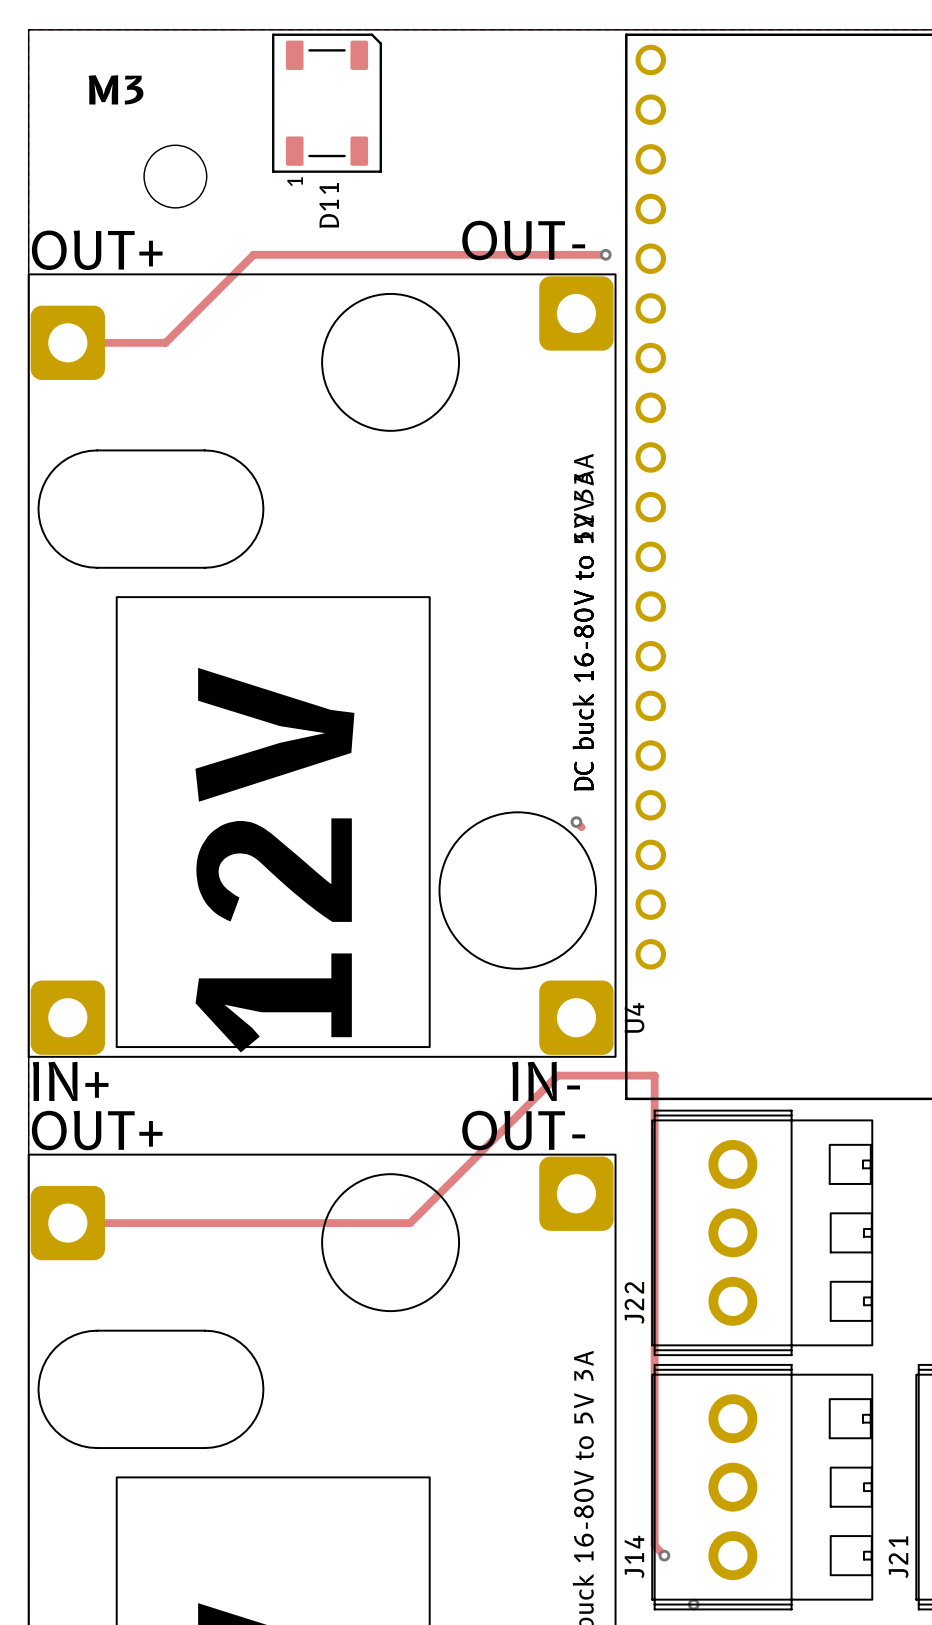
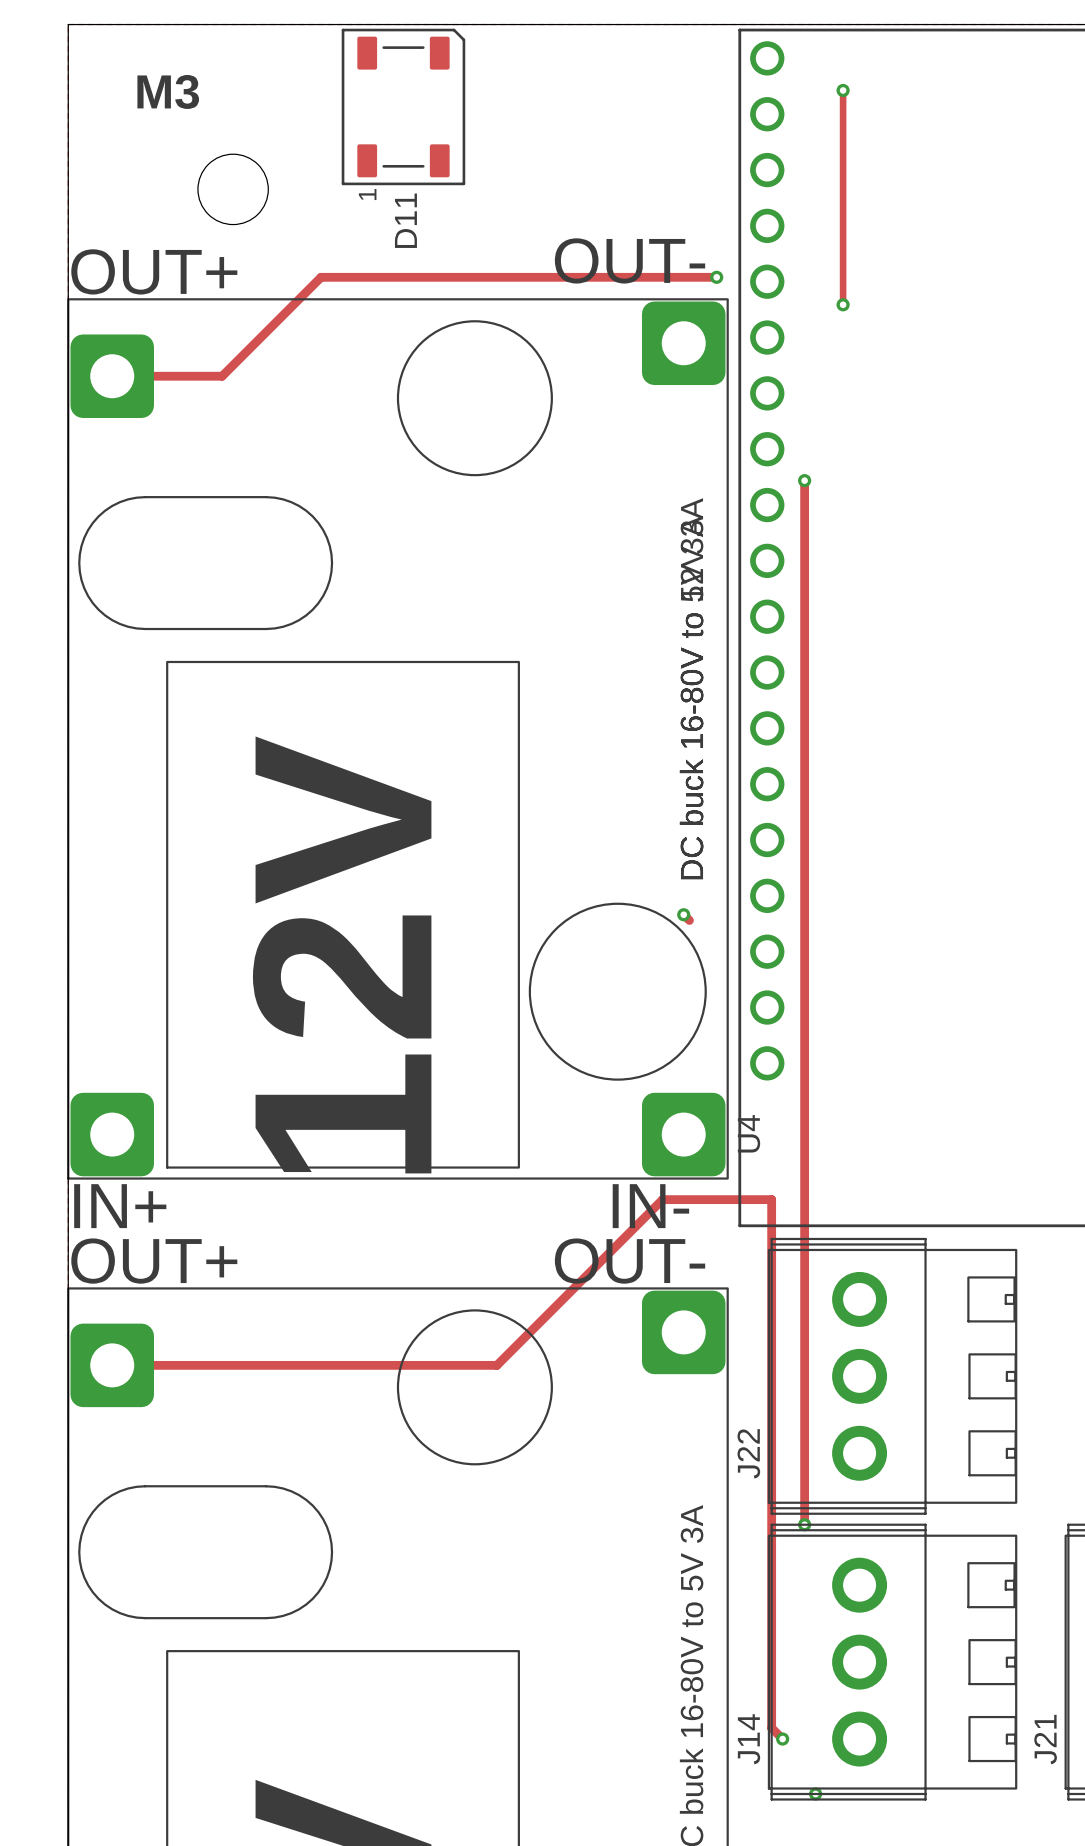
track: none -> (843, 90) (843, 304)
via: none -> (843, 90)
via: none -> (843, 304)
track: none -> (804, 480) (804, 1524)
via: none -> (804, 480)
via: none -> (804, 1524)

